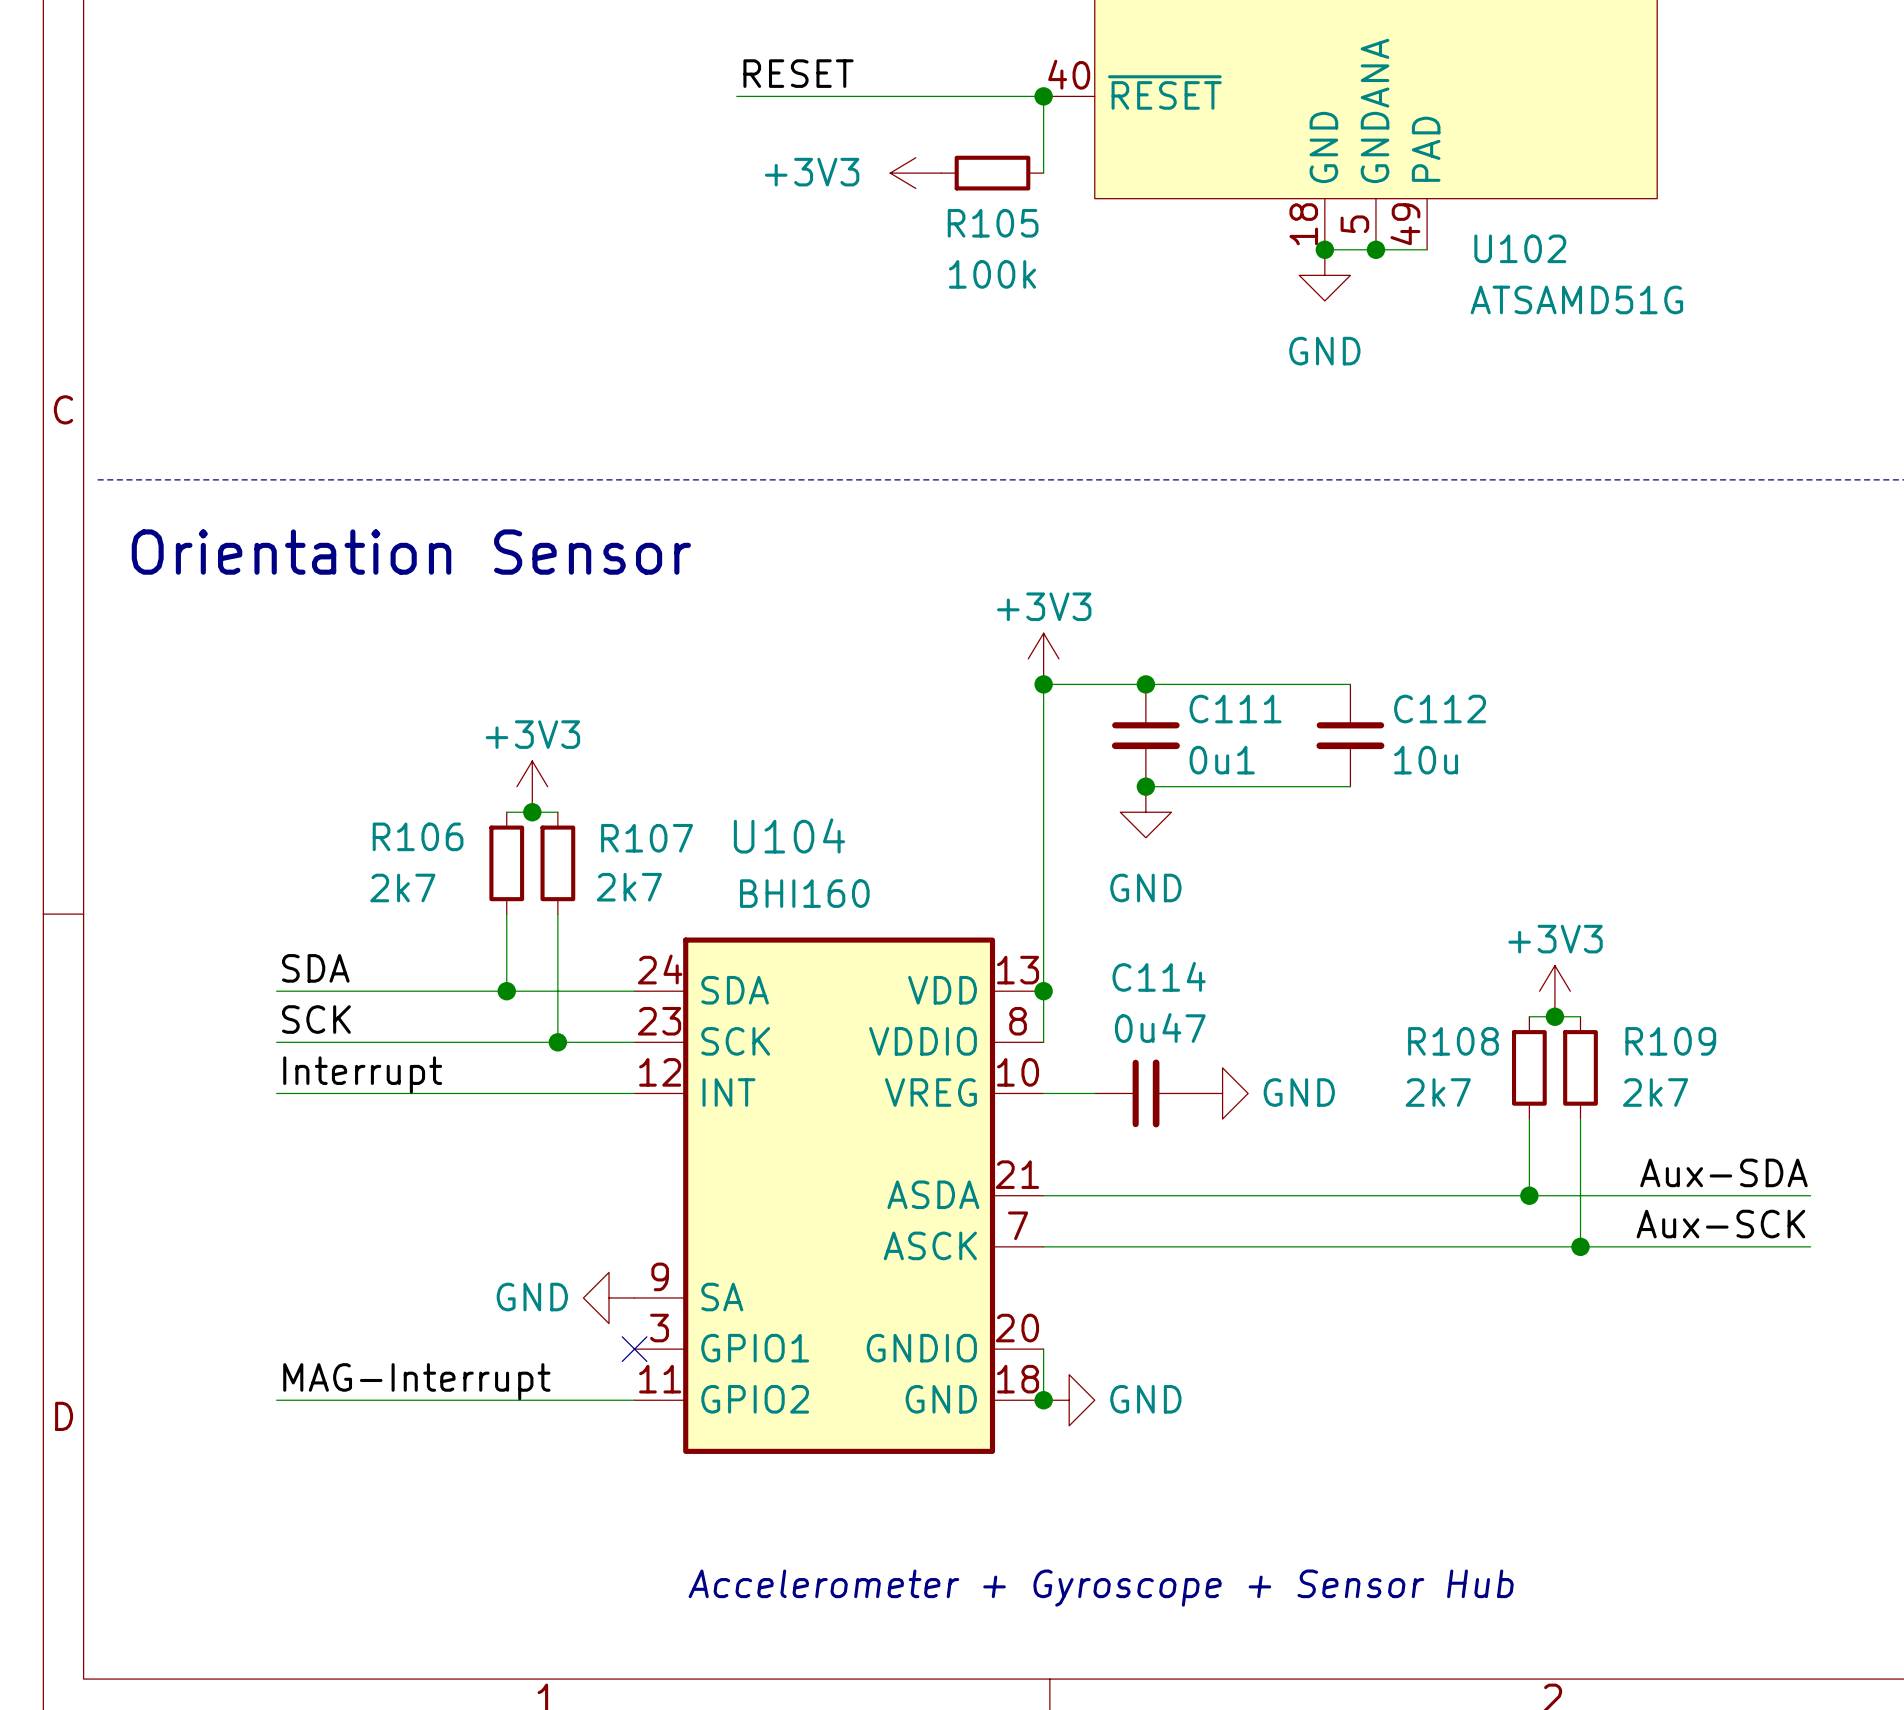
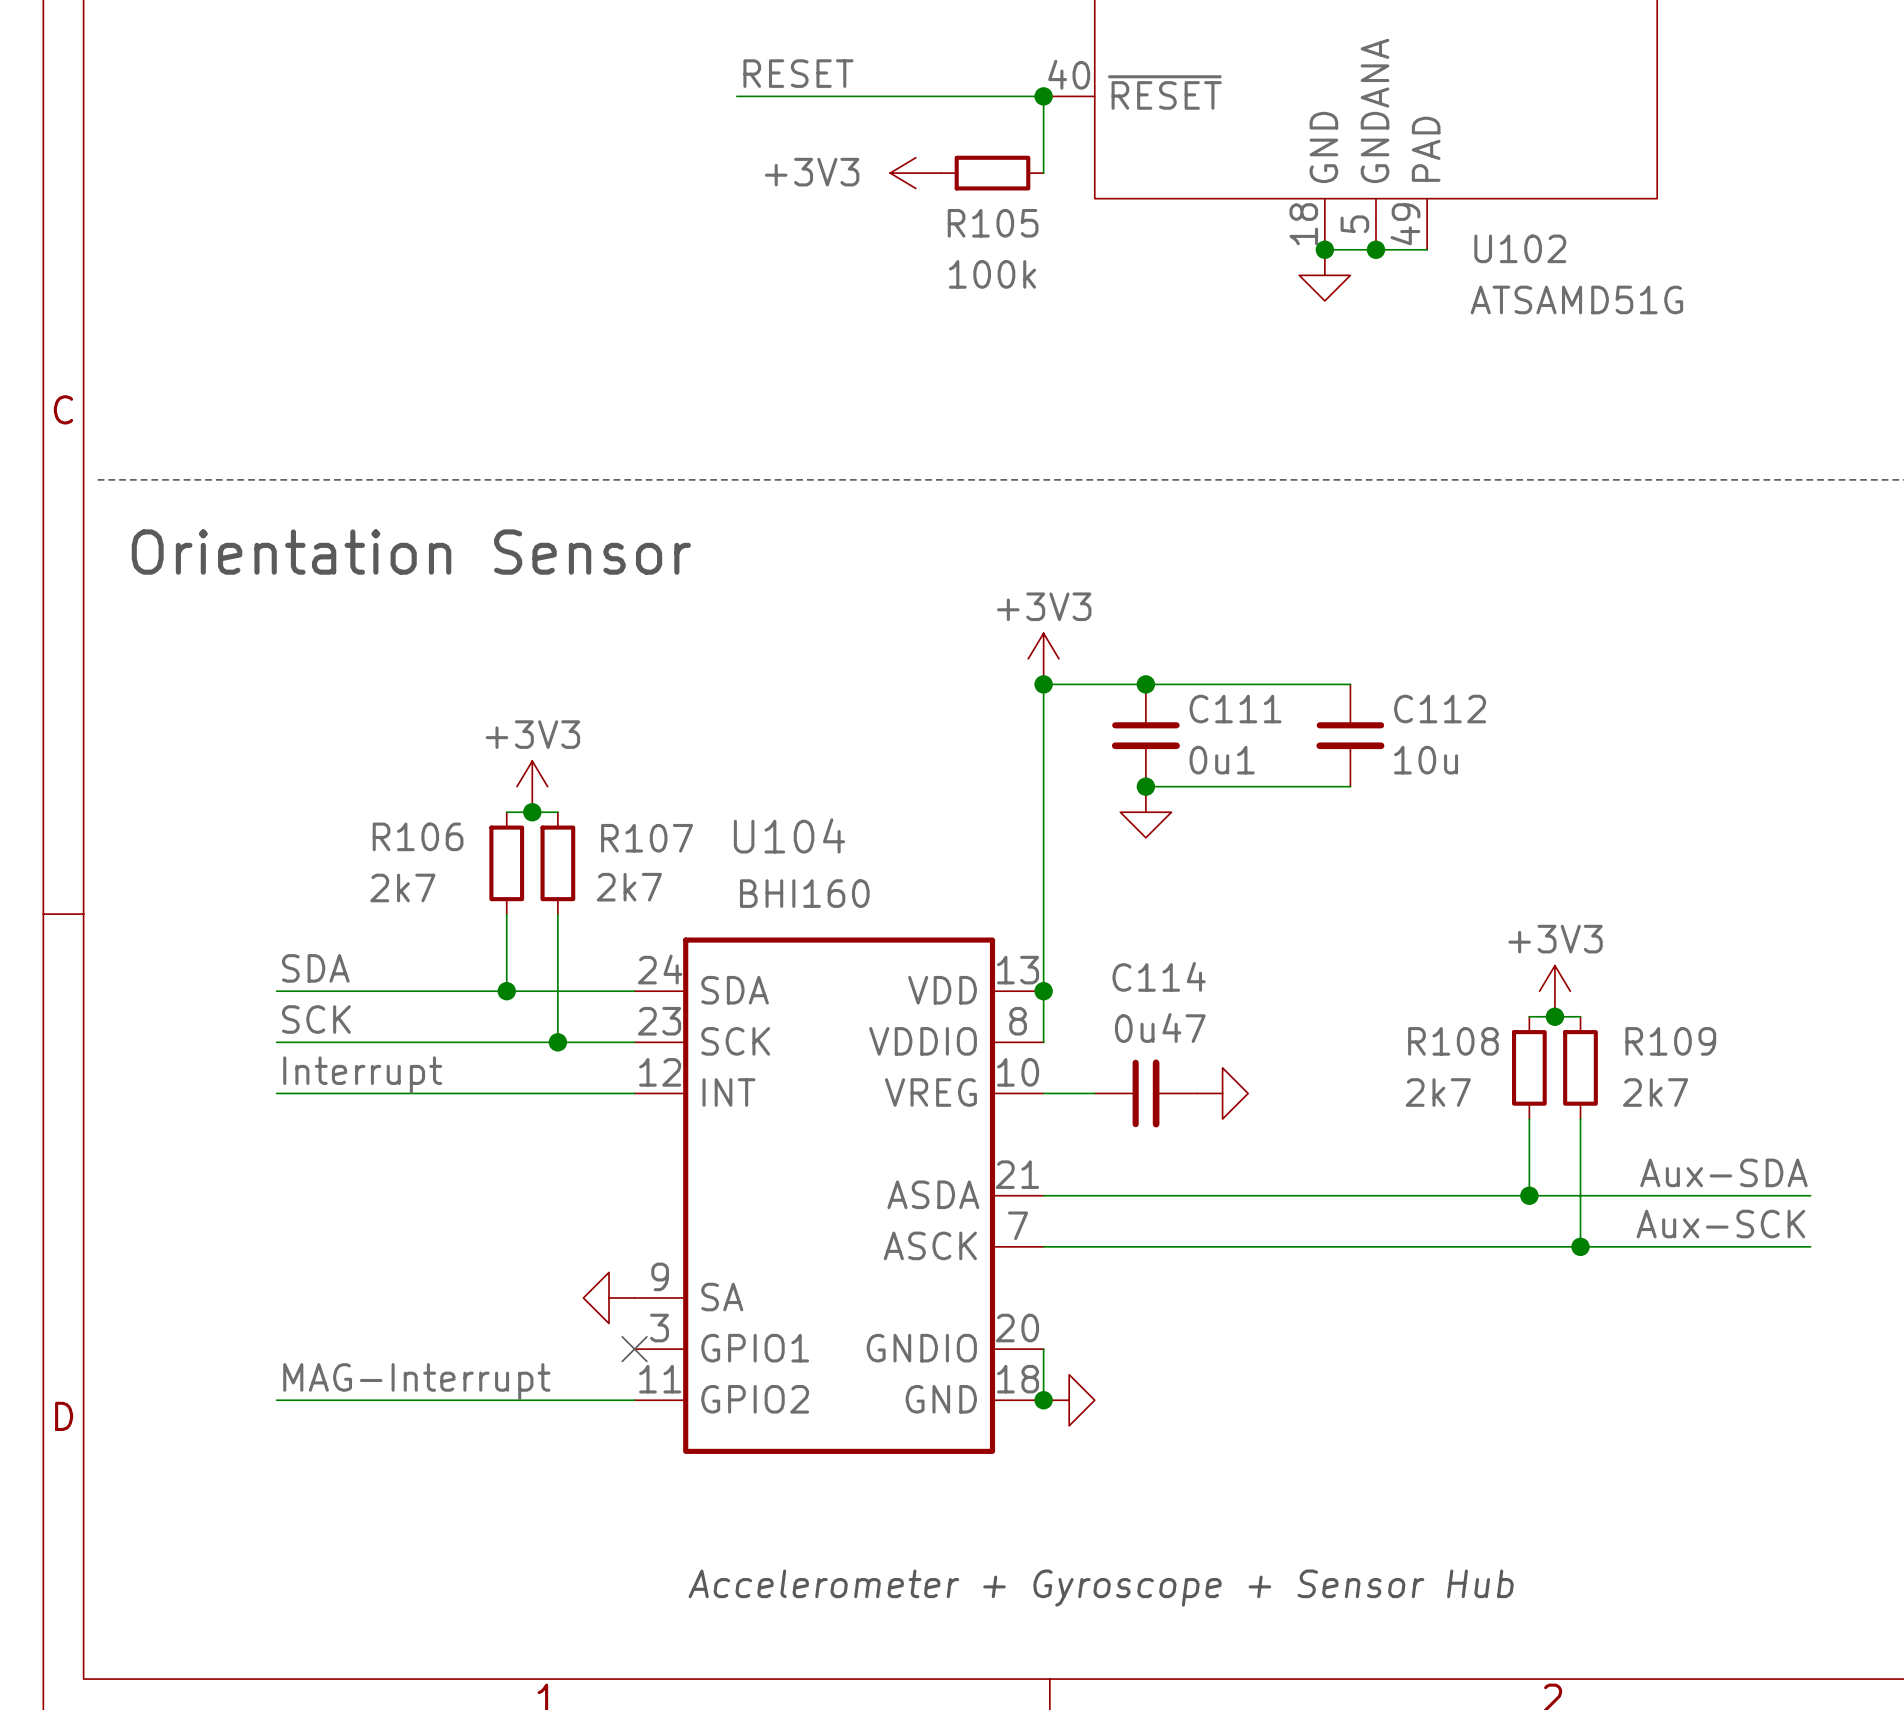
power symbol text: GND (1324, 351) -> none
power symbol text: GND (1145, 887) -> none
power symbol text: GND (1299, 1092) -> none
power symbol text: GND (532, 1297) -> none
power symbol text: GND (1145, 1399) -> none

